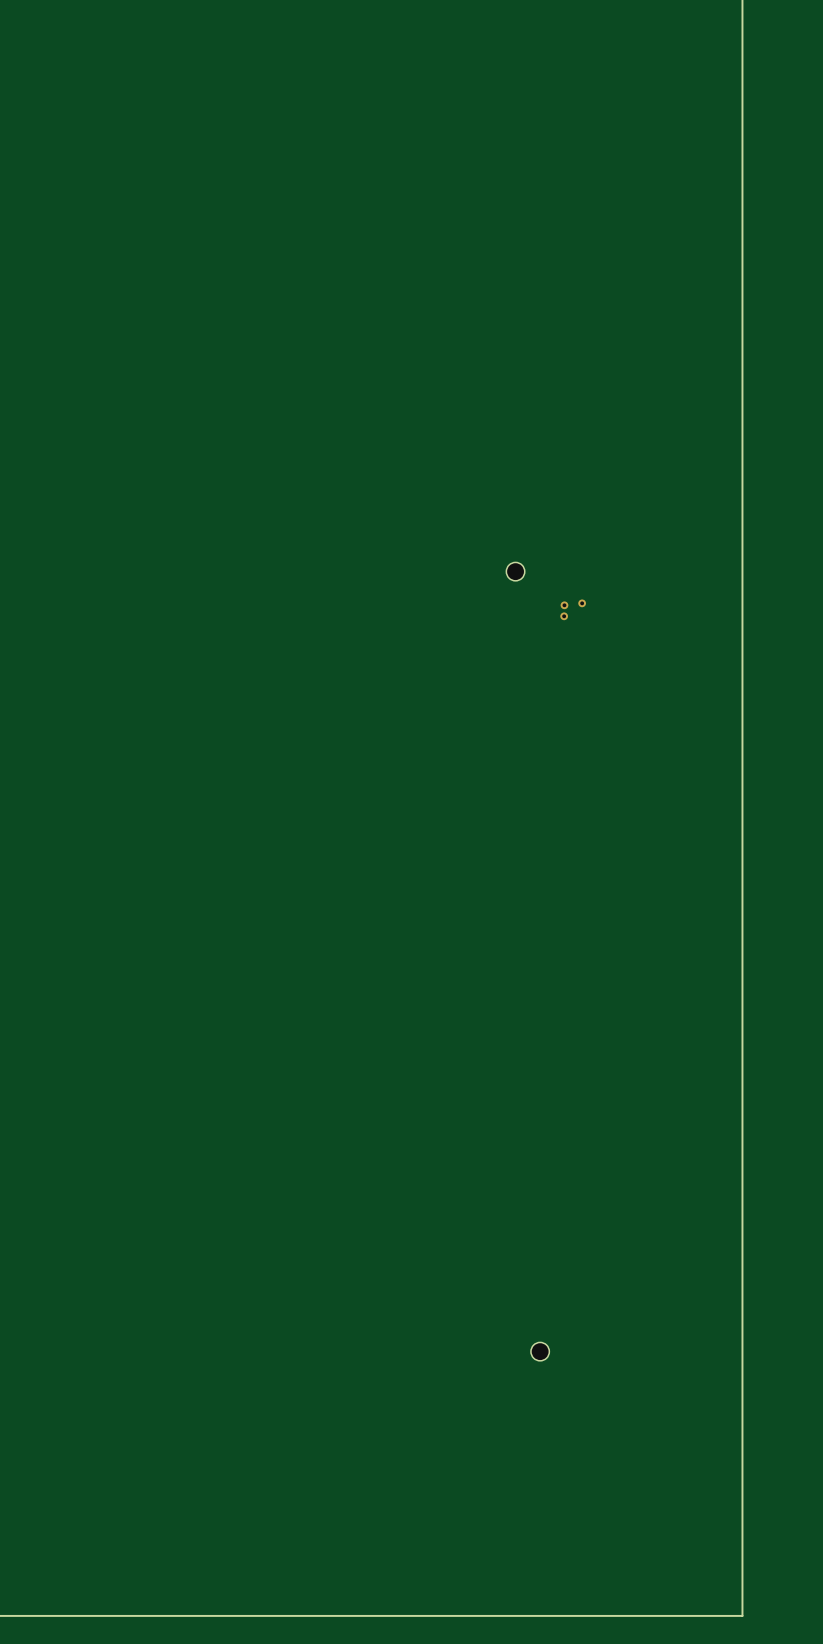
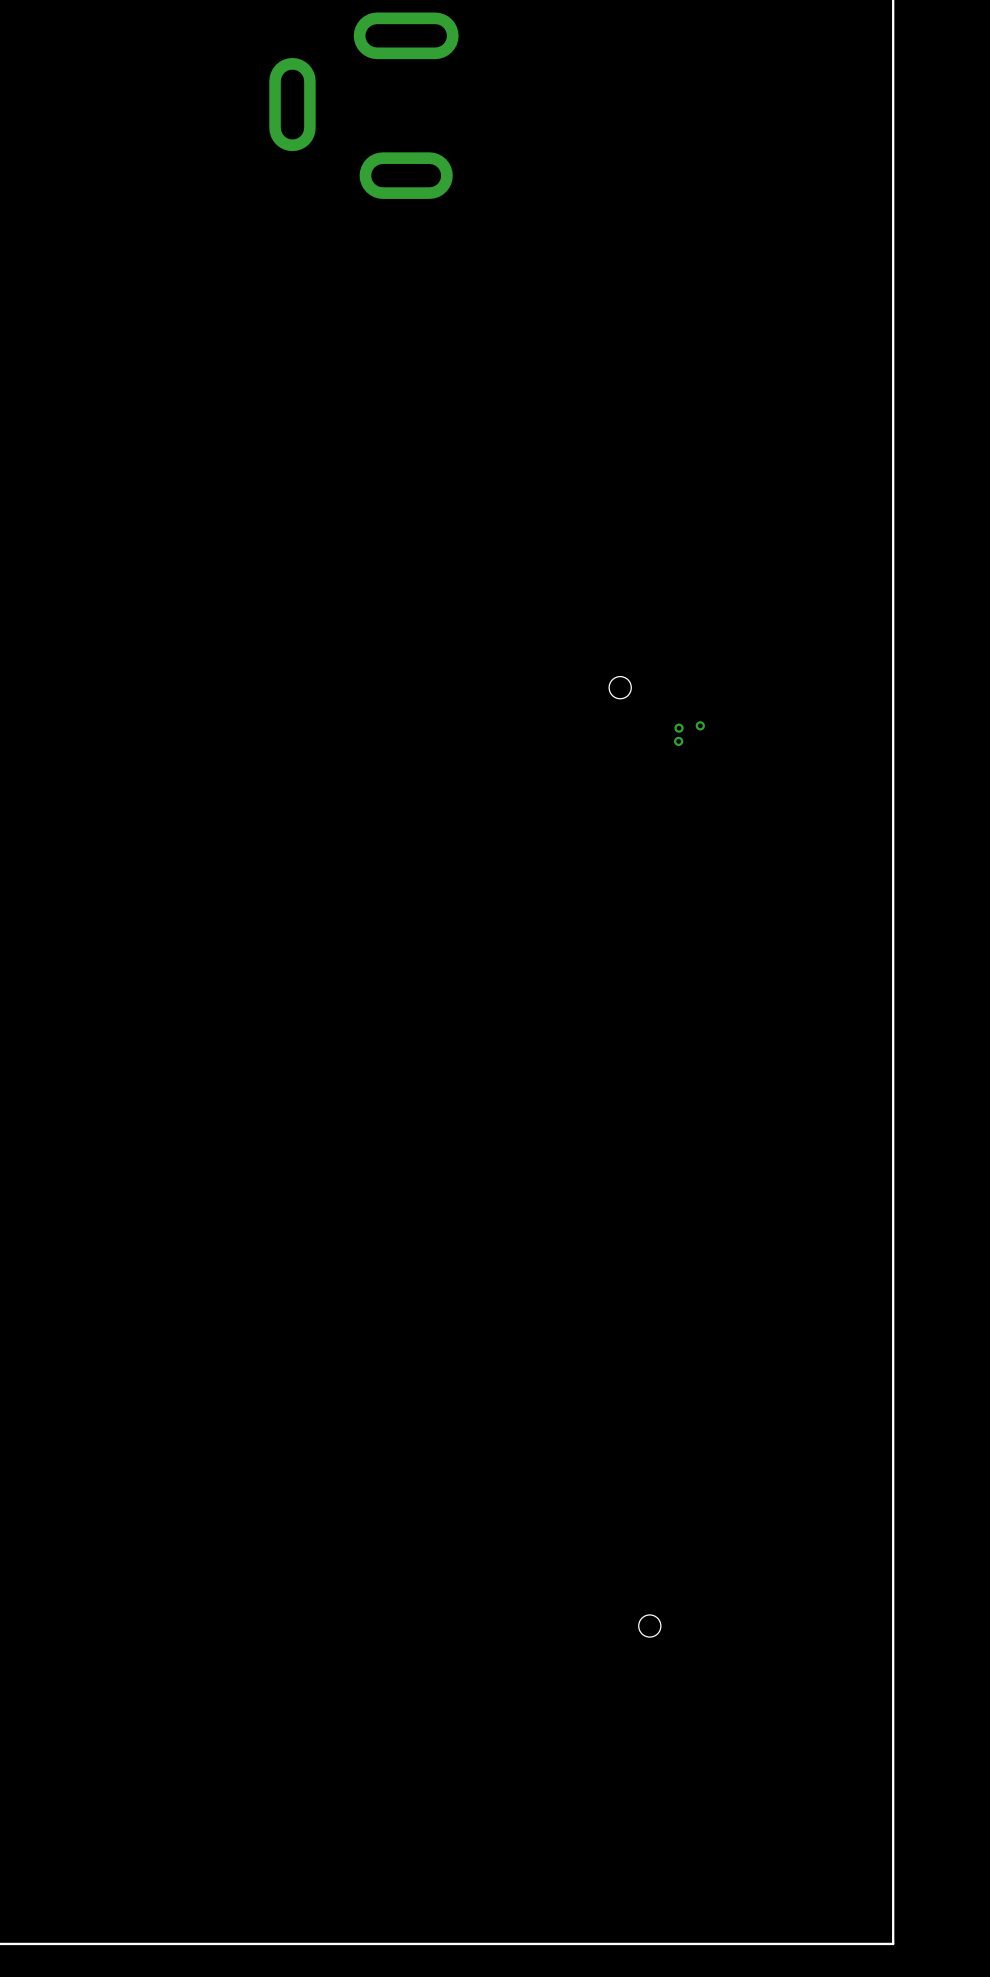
part: none -> (363, 105)

